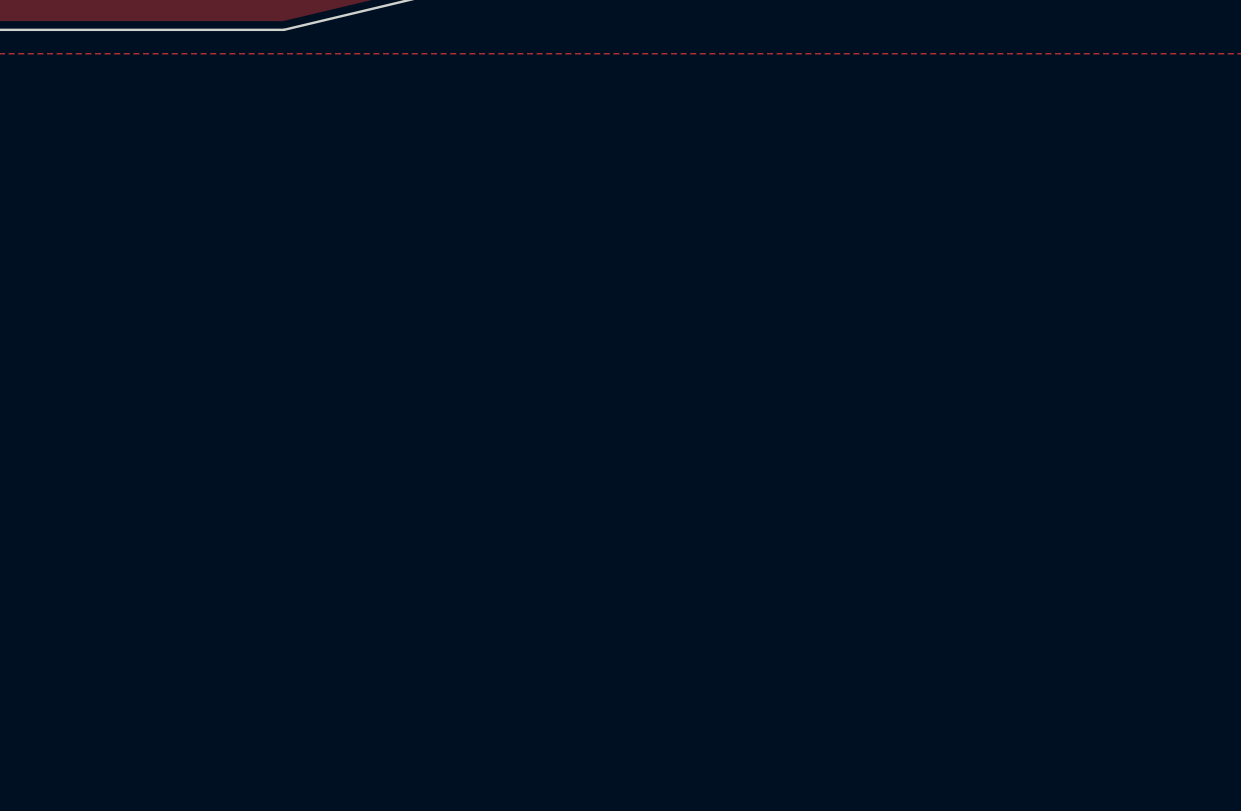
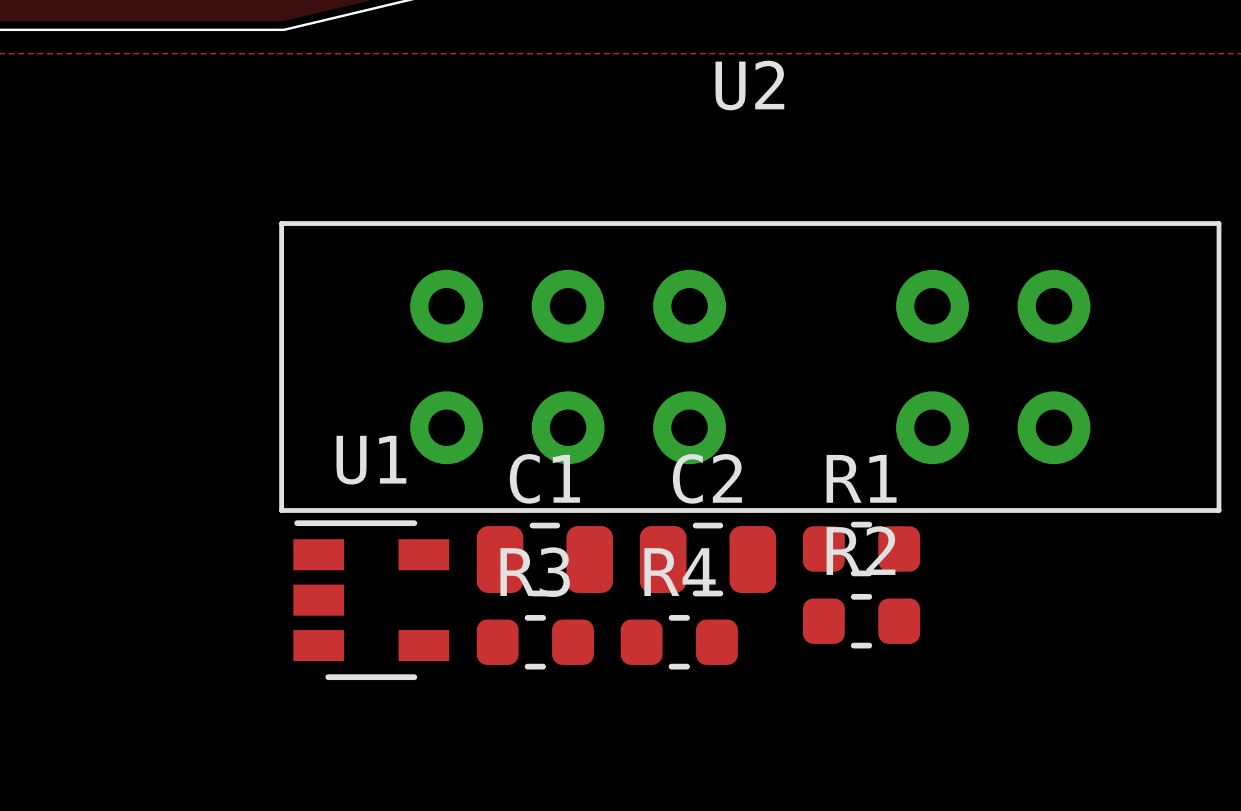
U2: none -> (750, 367)
R1: none -> (861, 549)
C1: none -> (544, 559)
C2: none -> (707, 559)
U1: none -> (371, 600)
R2: none -> (861, 621)
R3: none -> (535, 642)
R4: none -> (679, 642)

